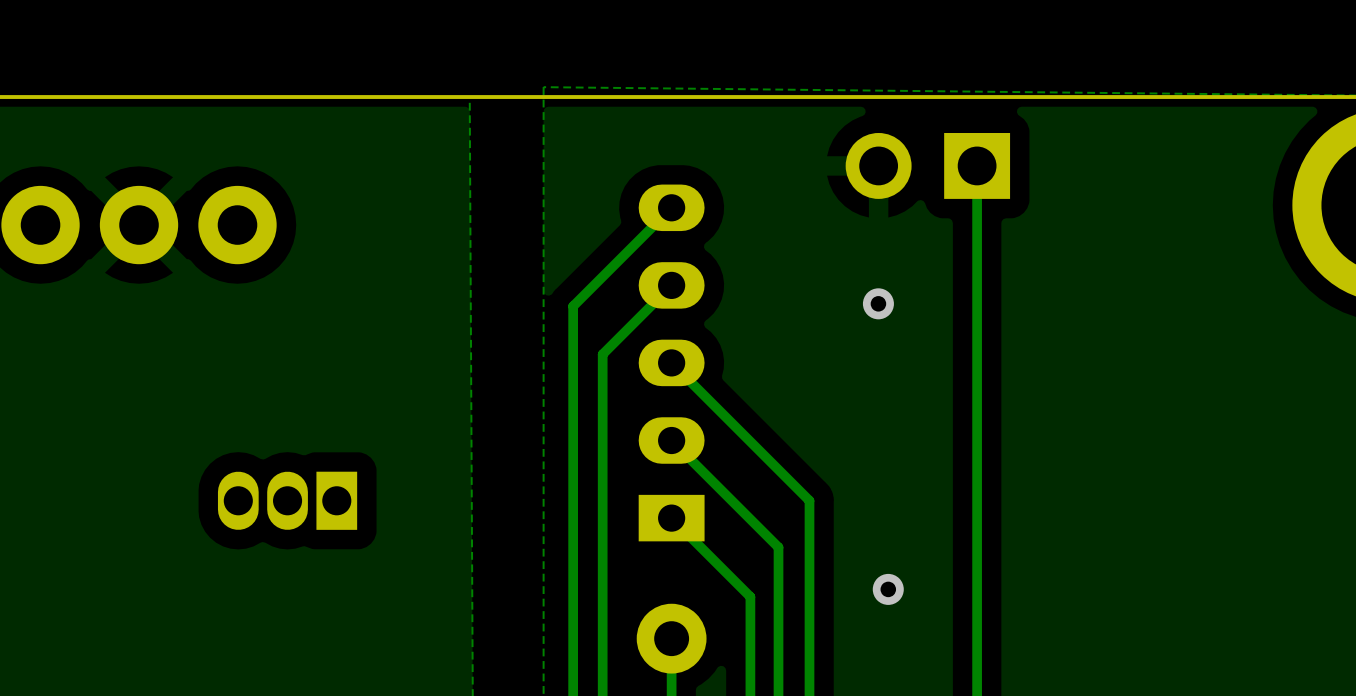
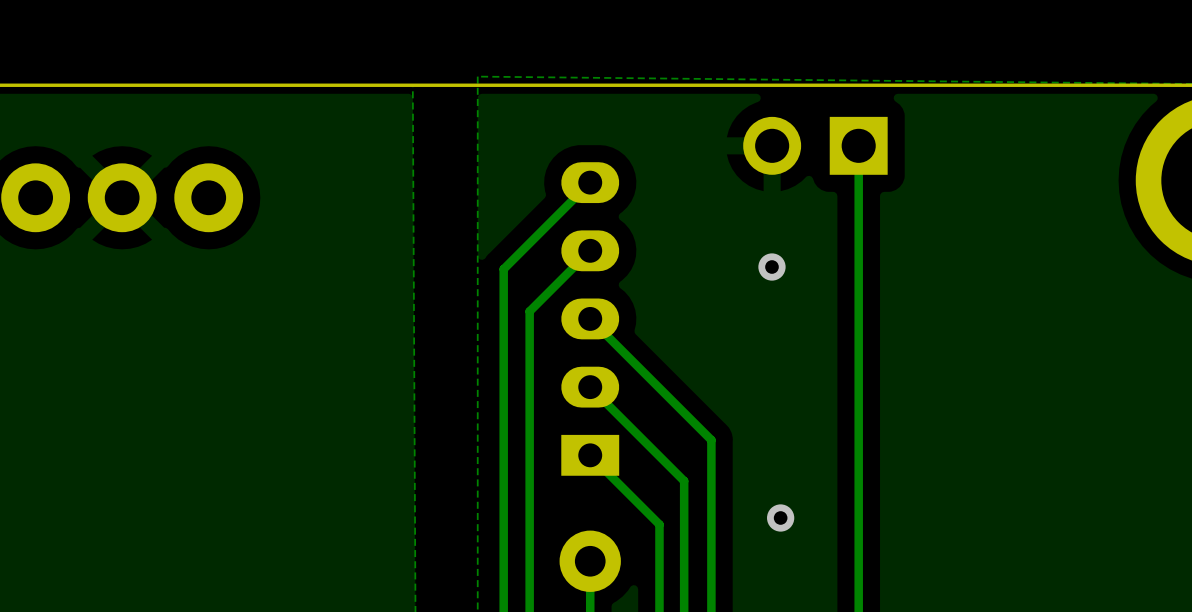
part: (287, 500) -> none

